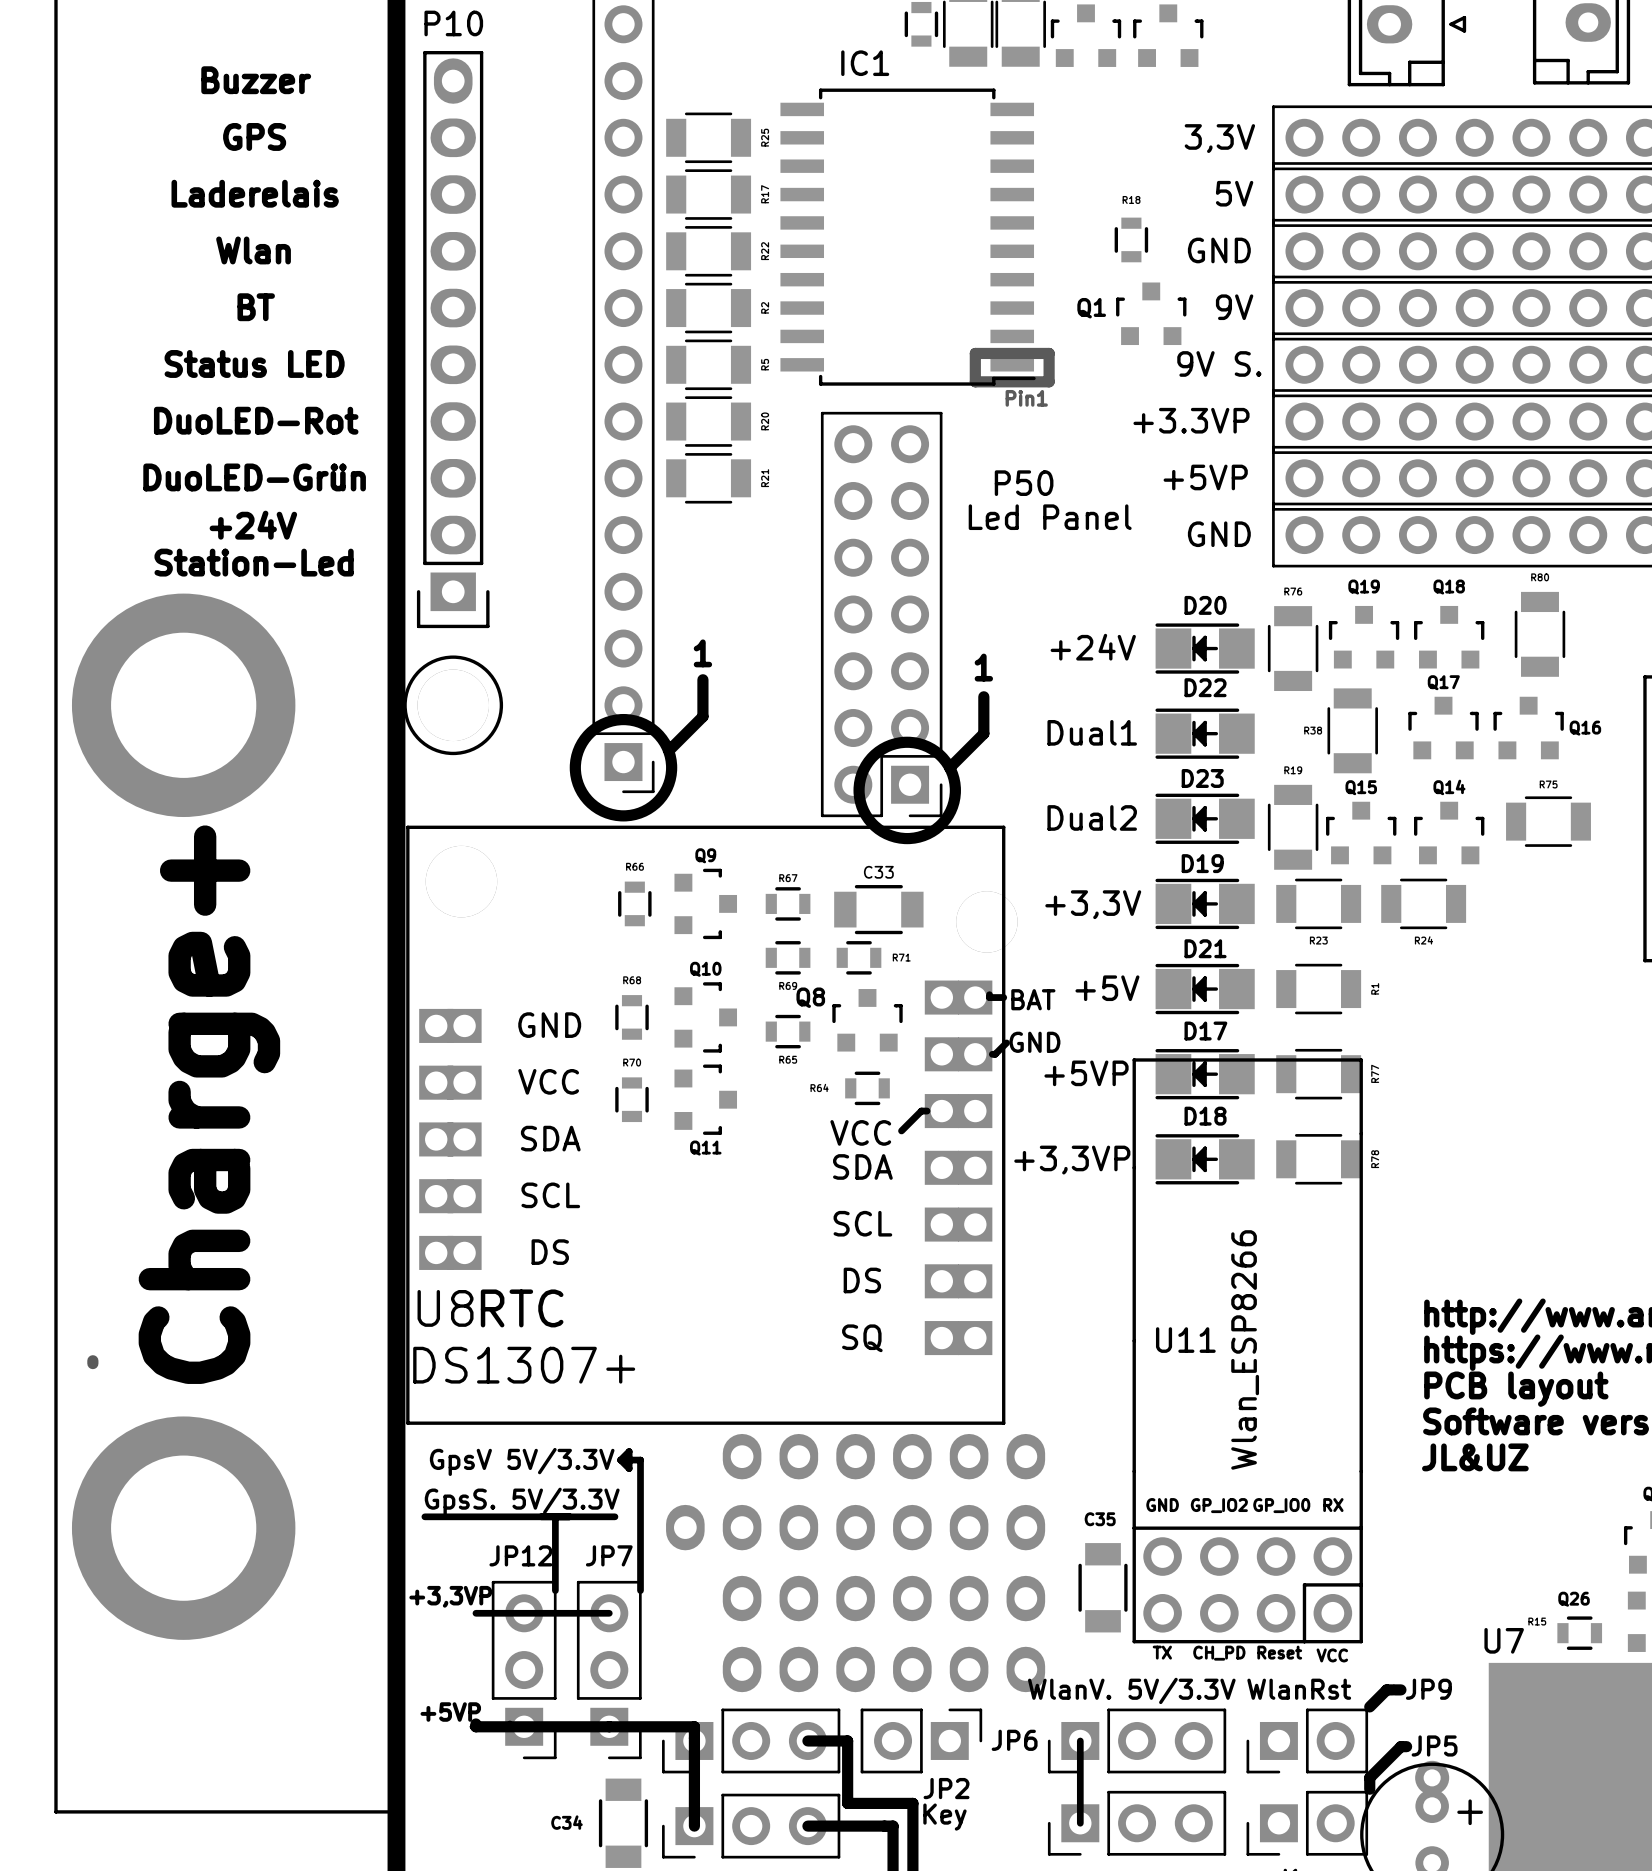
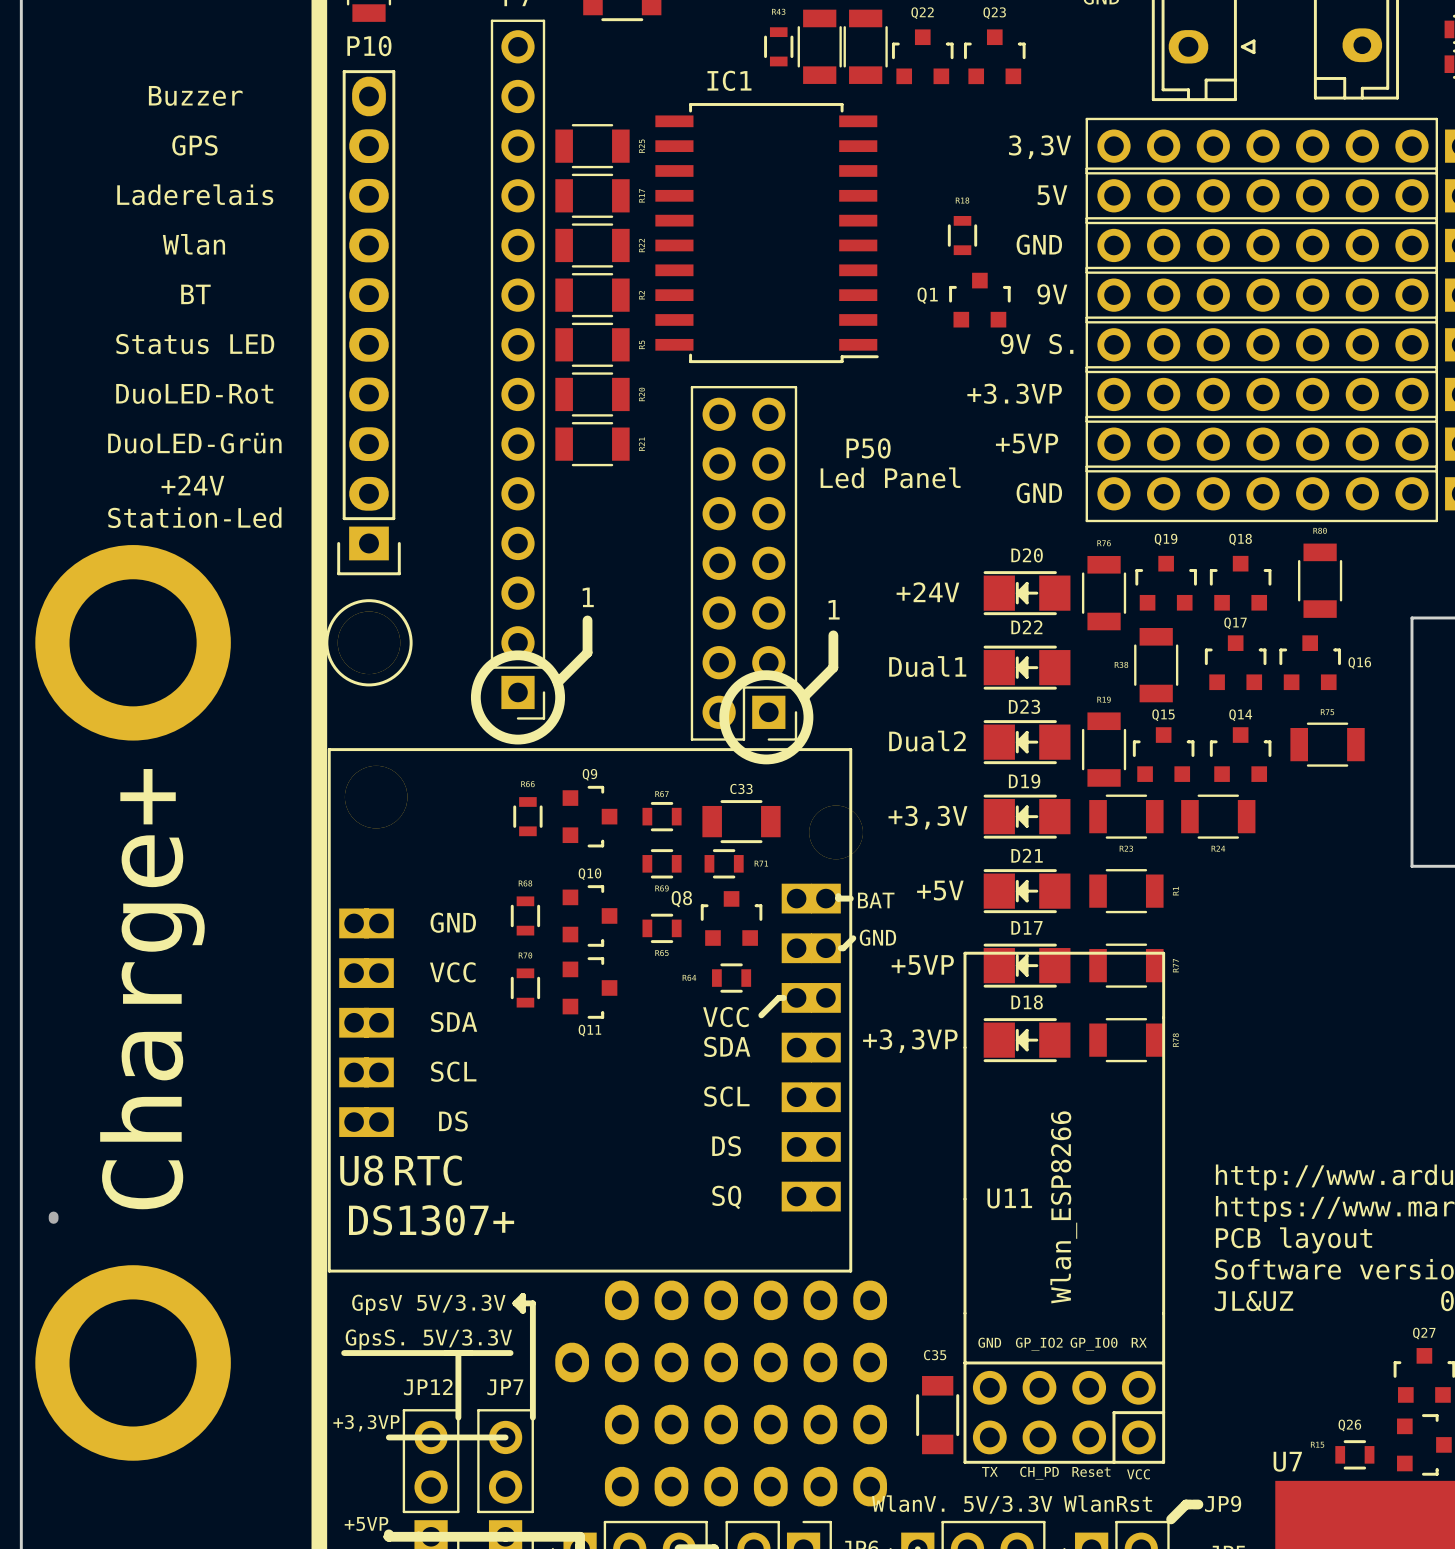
line: (975, 353) (975, 381) (1049, 381) (1049, 353) (975, 353) -> none
text: Pin1 (1026, 398) -> none

